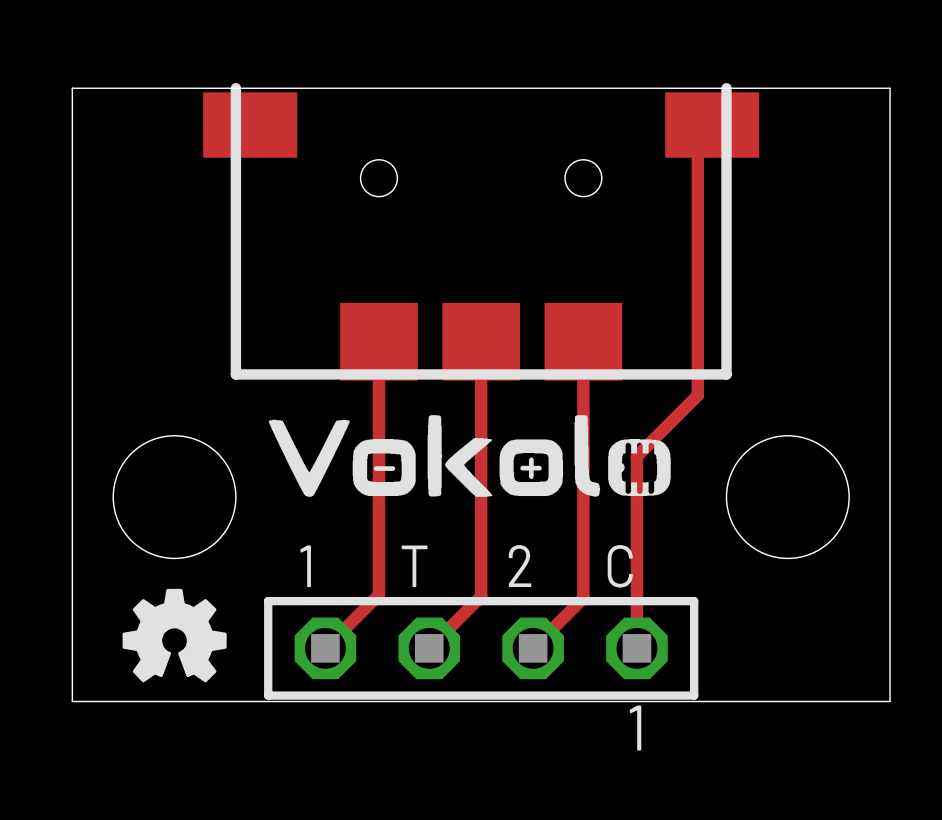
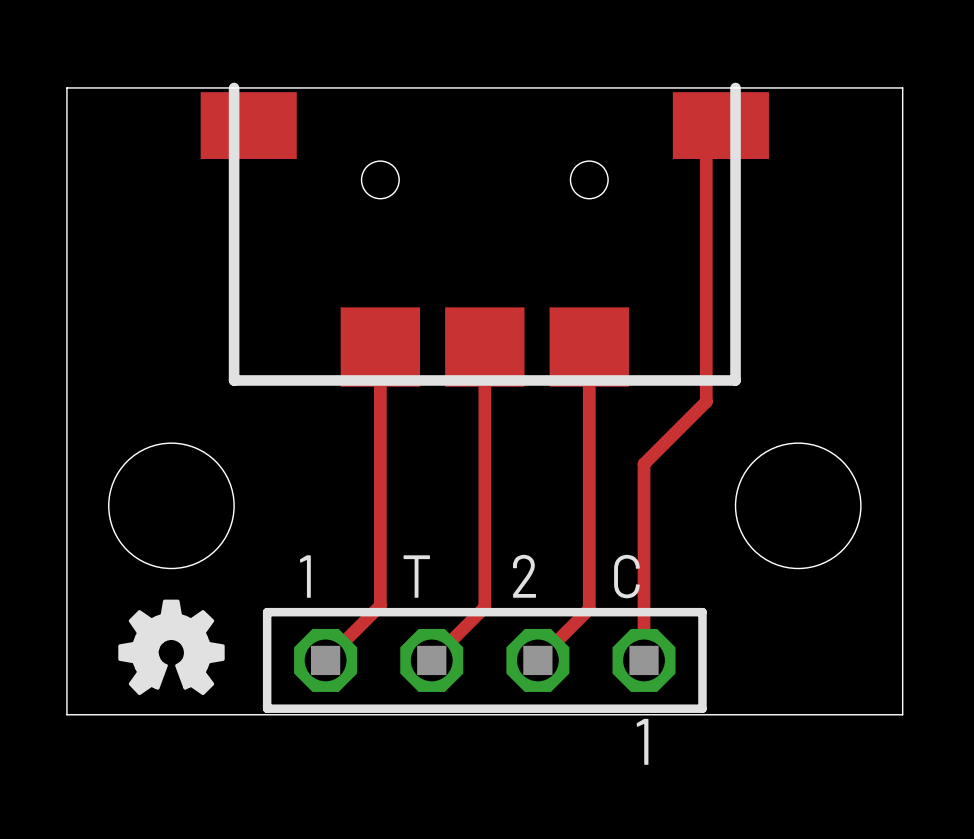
drawing: [268, 415, 671, 497] -> none

